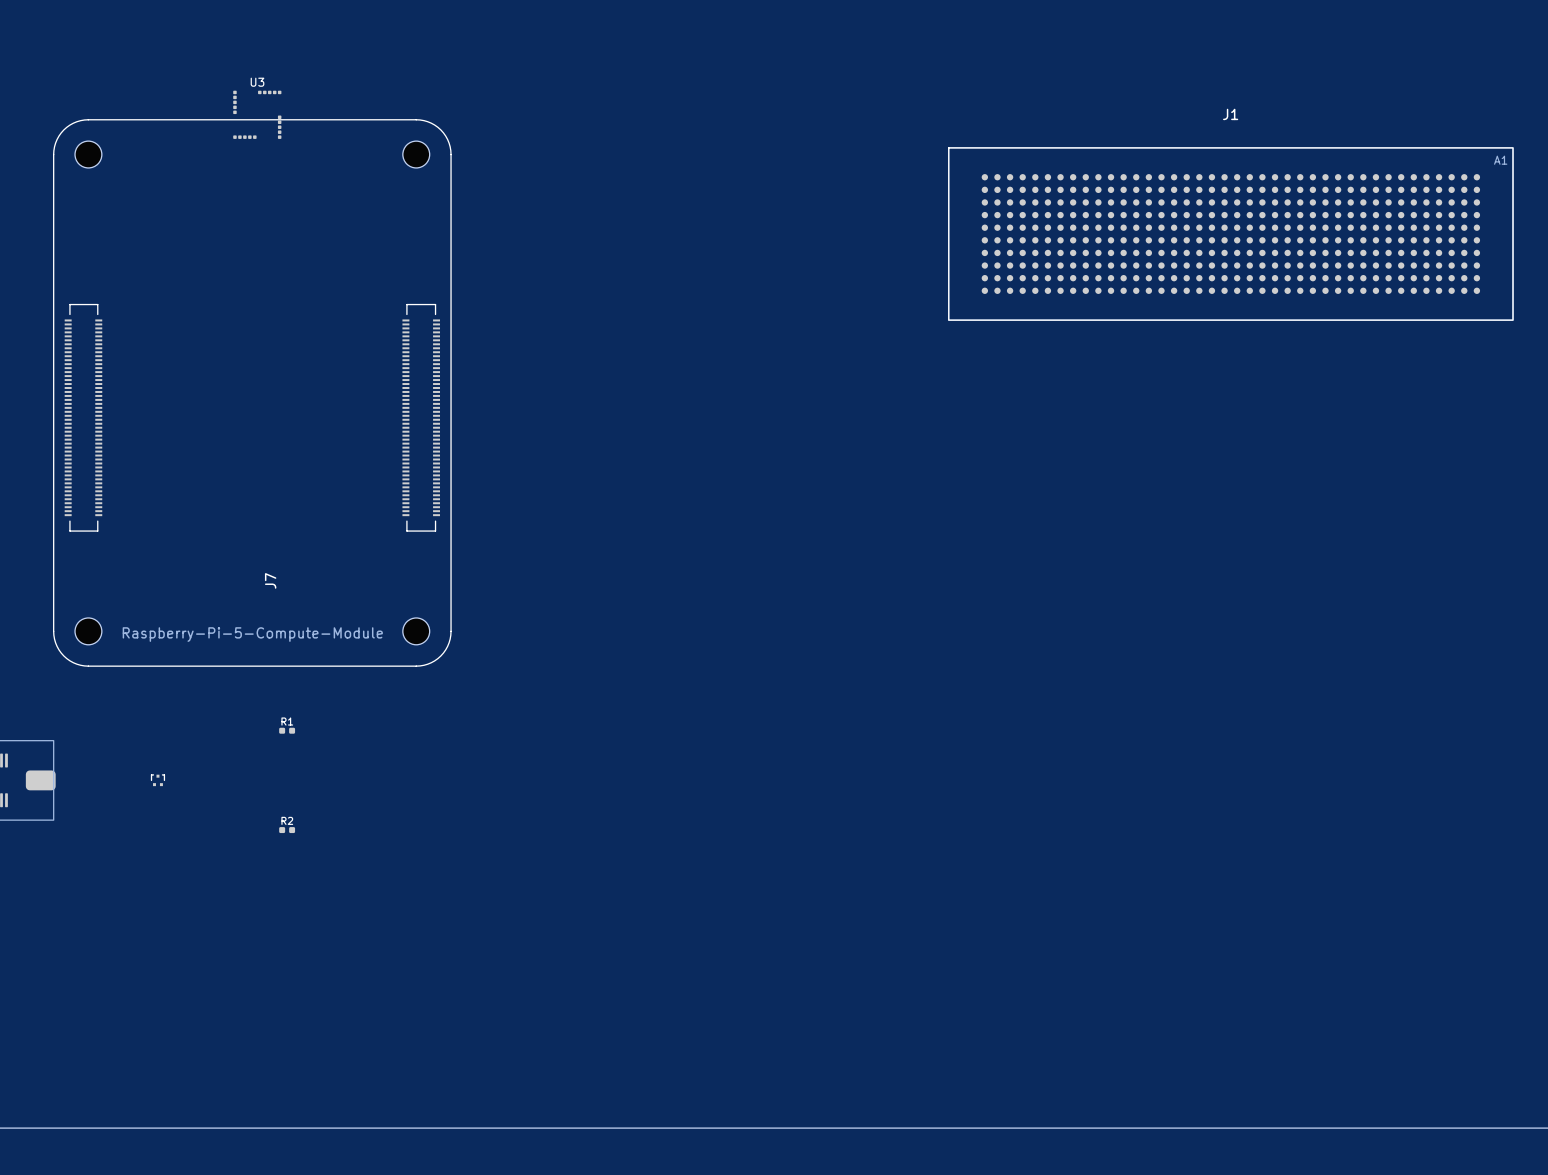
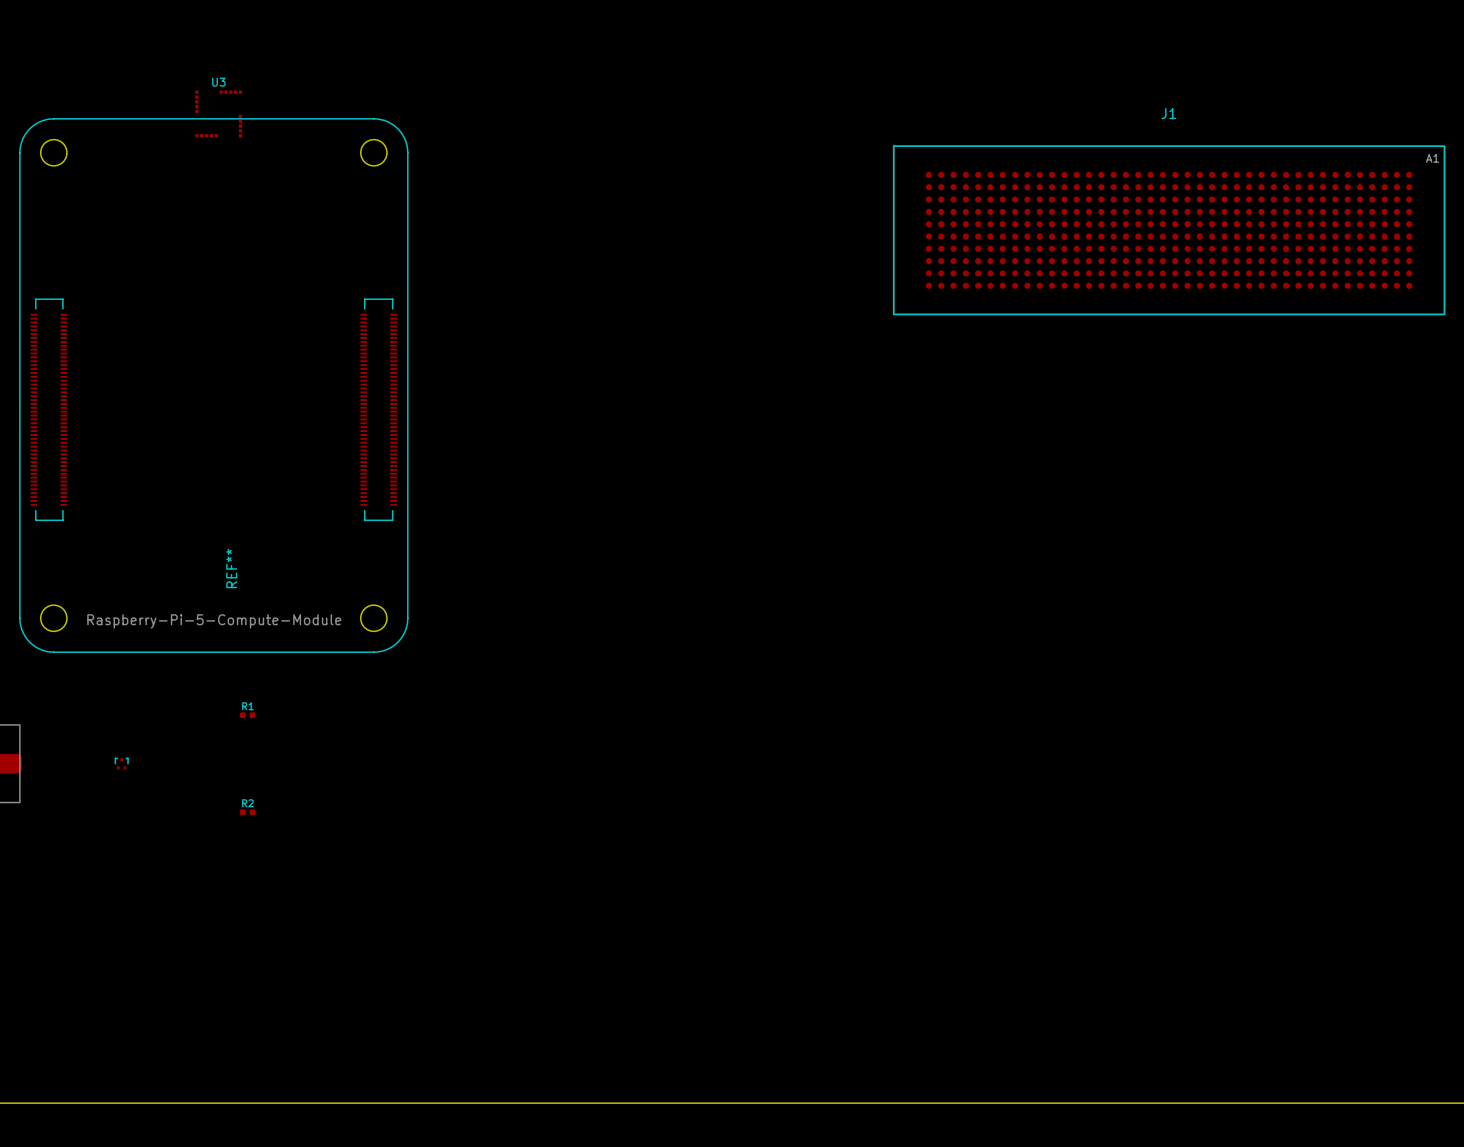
J7 name: J7 (270, 580) -> REF** (231, 568)

